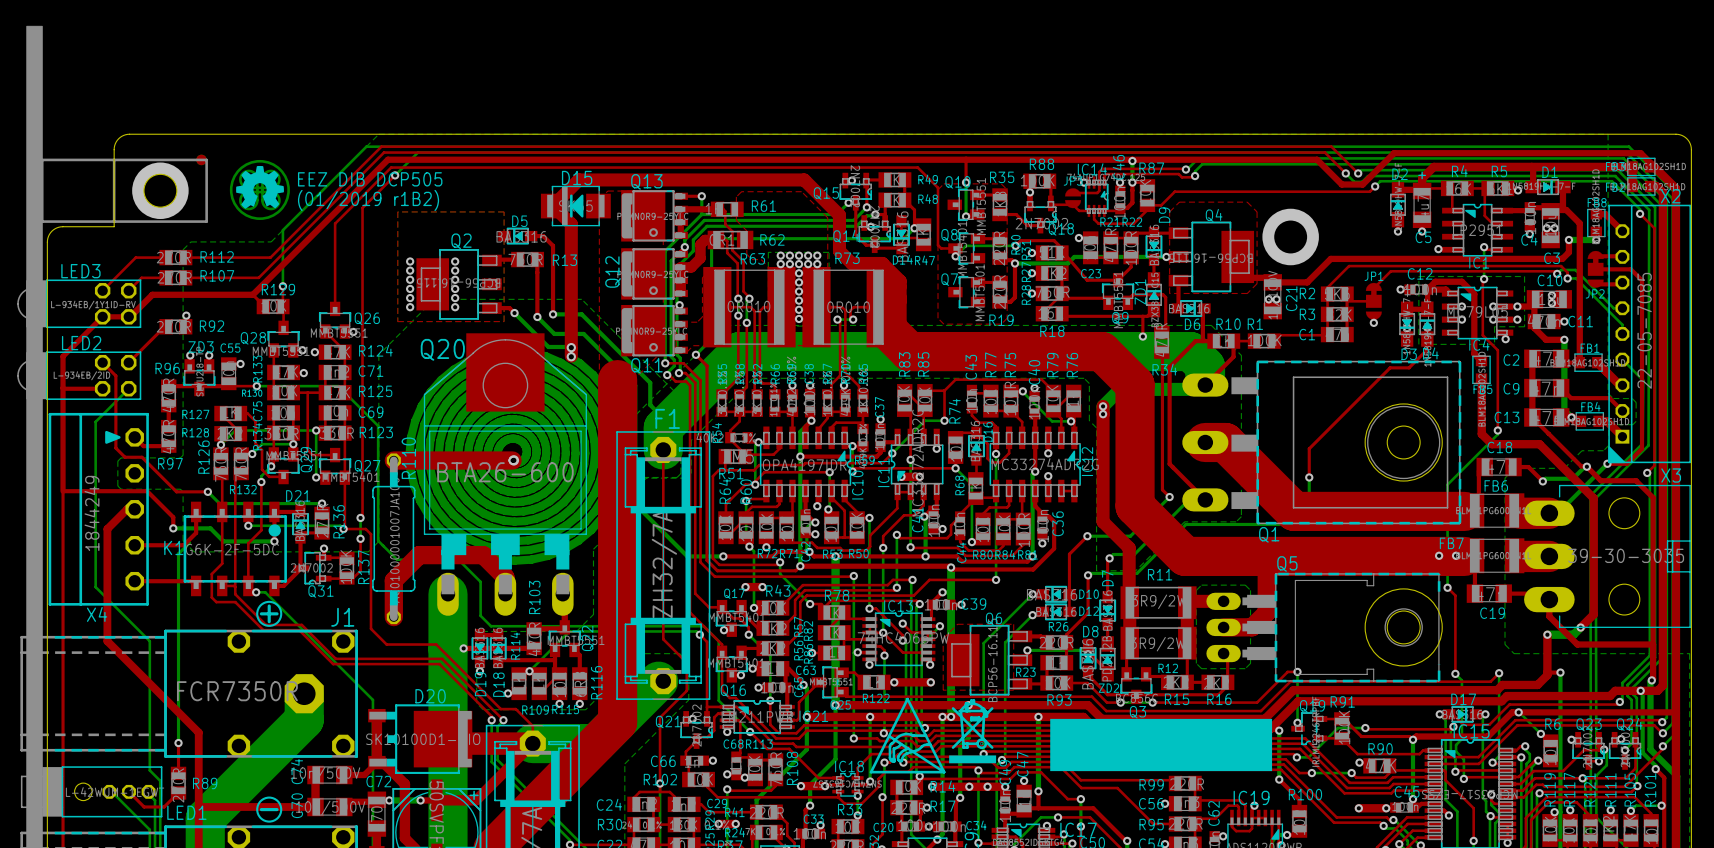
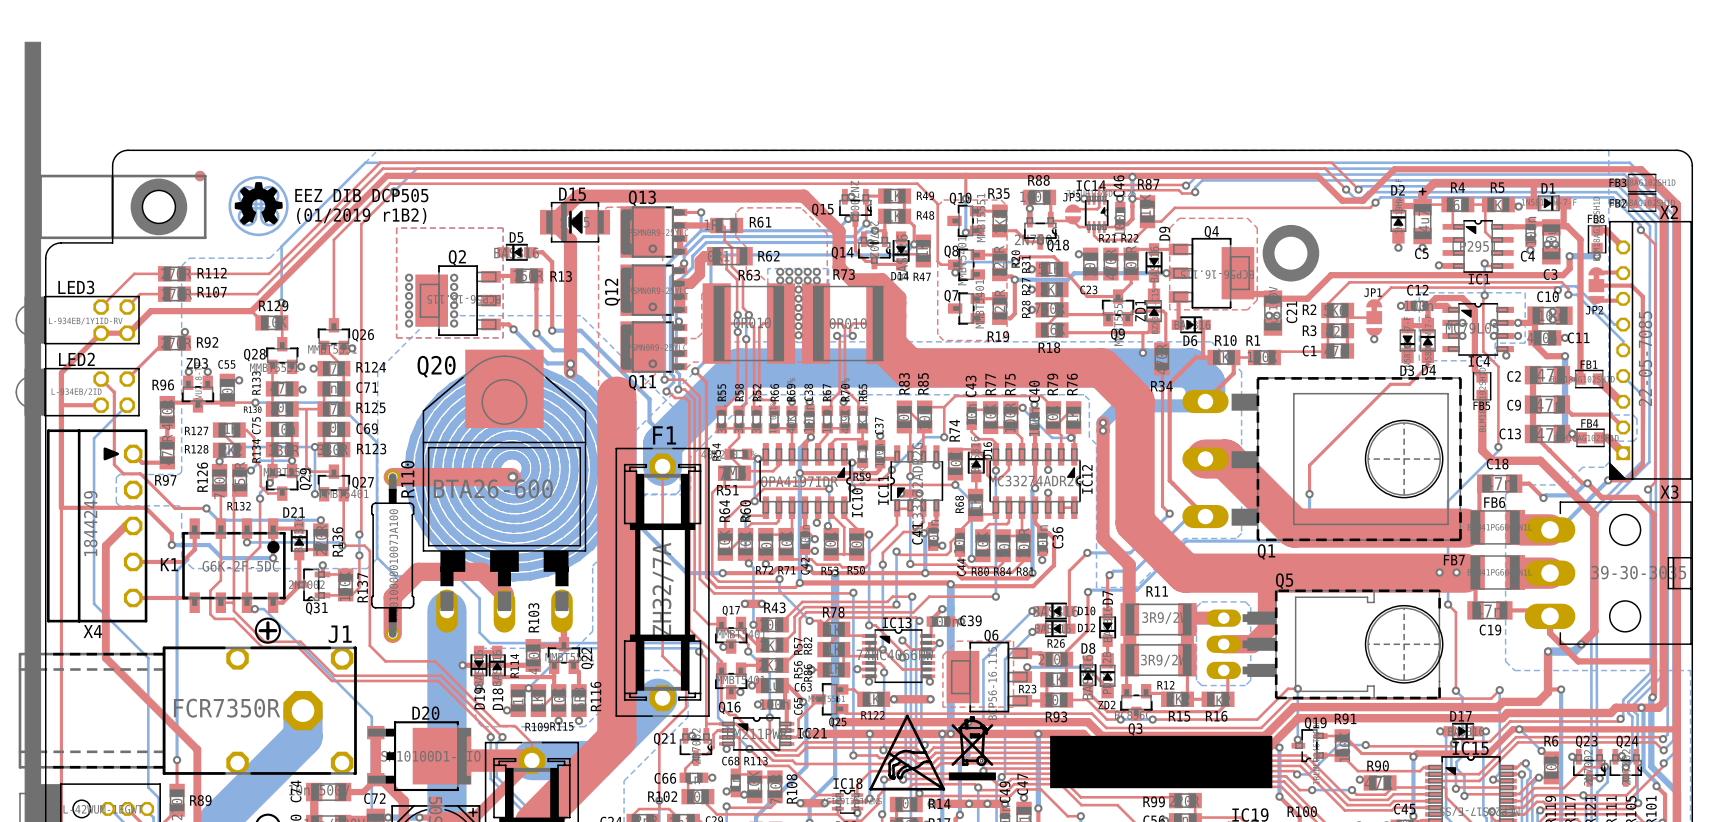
Q1 footprint: [1182, 360, 1461, 525] -> [1182, 377, 1462, 541]
Q5 footprint: [1206, 573, 1440, 682] -> [1206, 590, 1441, 699]

